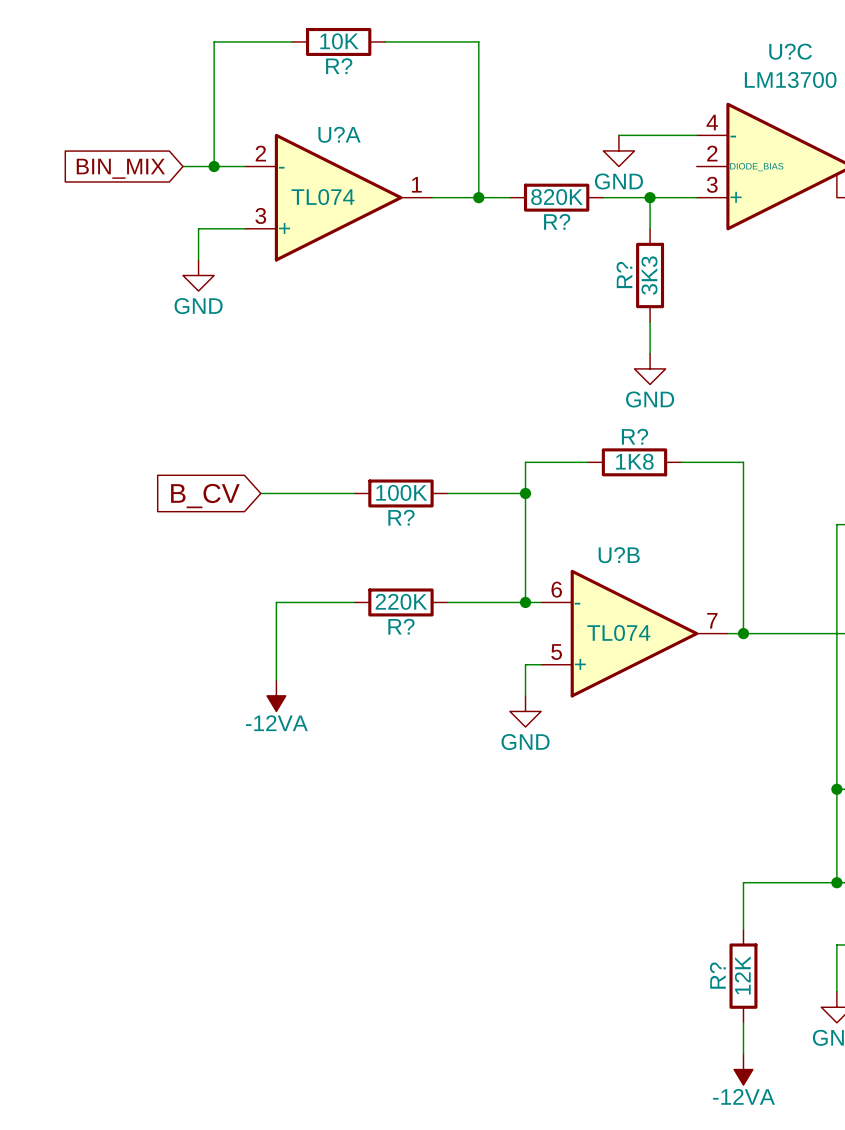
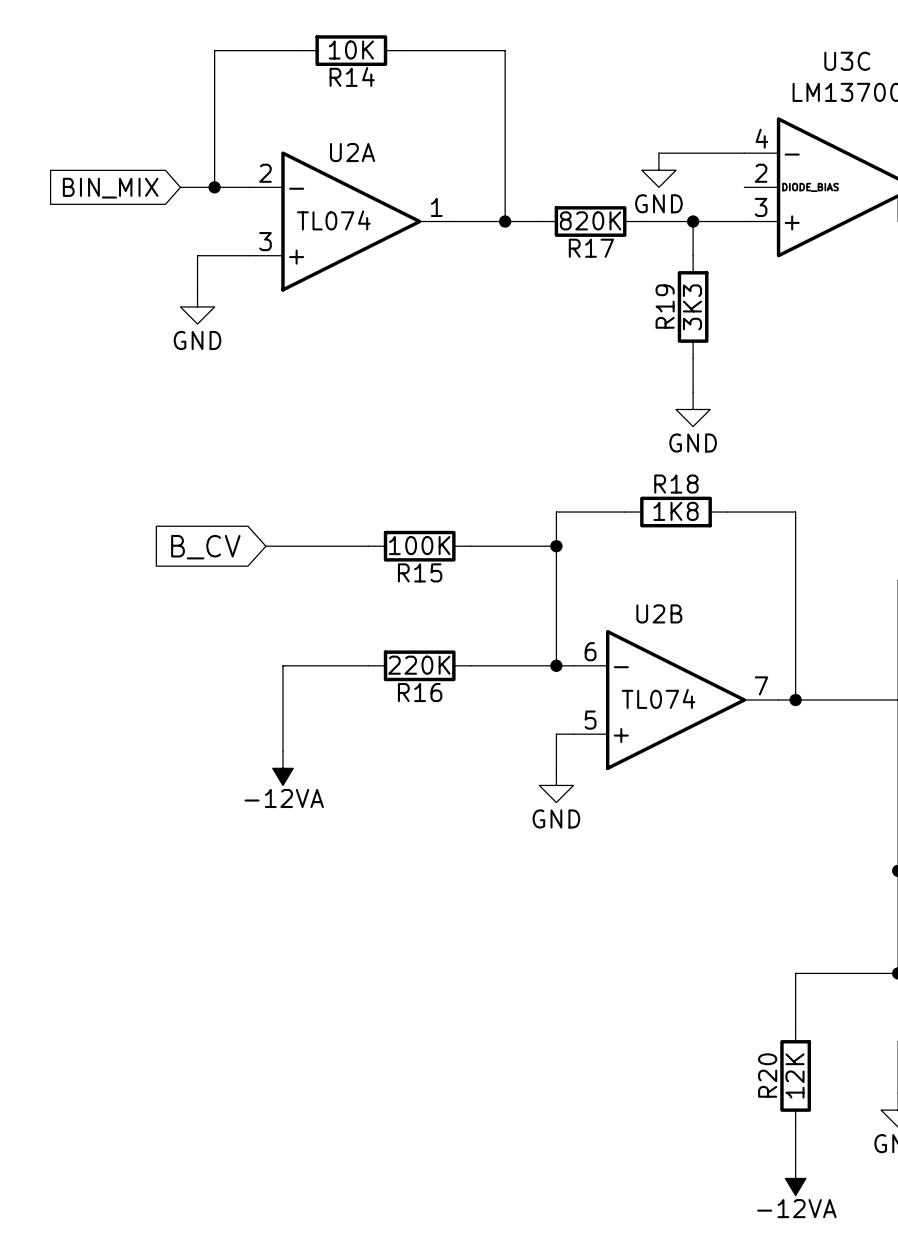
U?C name: U?C (790, 51) -> U3C (847, 61)
R? name: R? (339, 66) -> R14 (352, 76)
U?A name: U?A (339, 134) -> U2A (352, 152)
R? name: R? (557, 221) -> R17 (591, 248)
R? name: R? (624, 275) -> R19 (665, 306)
R? name: R? (635, 436) -> R18 (676, 484)
R? name: R? (401, 517) -> R15 (420, 572)
U?B name: U?B (619, 555) -> U2B (659, 613)
R? name: R? (401, 626) -> R16 (420, 692)
R? name: R? (717, 975) -> R20 (767, 1075)

